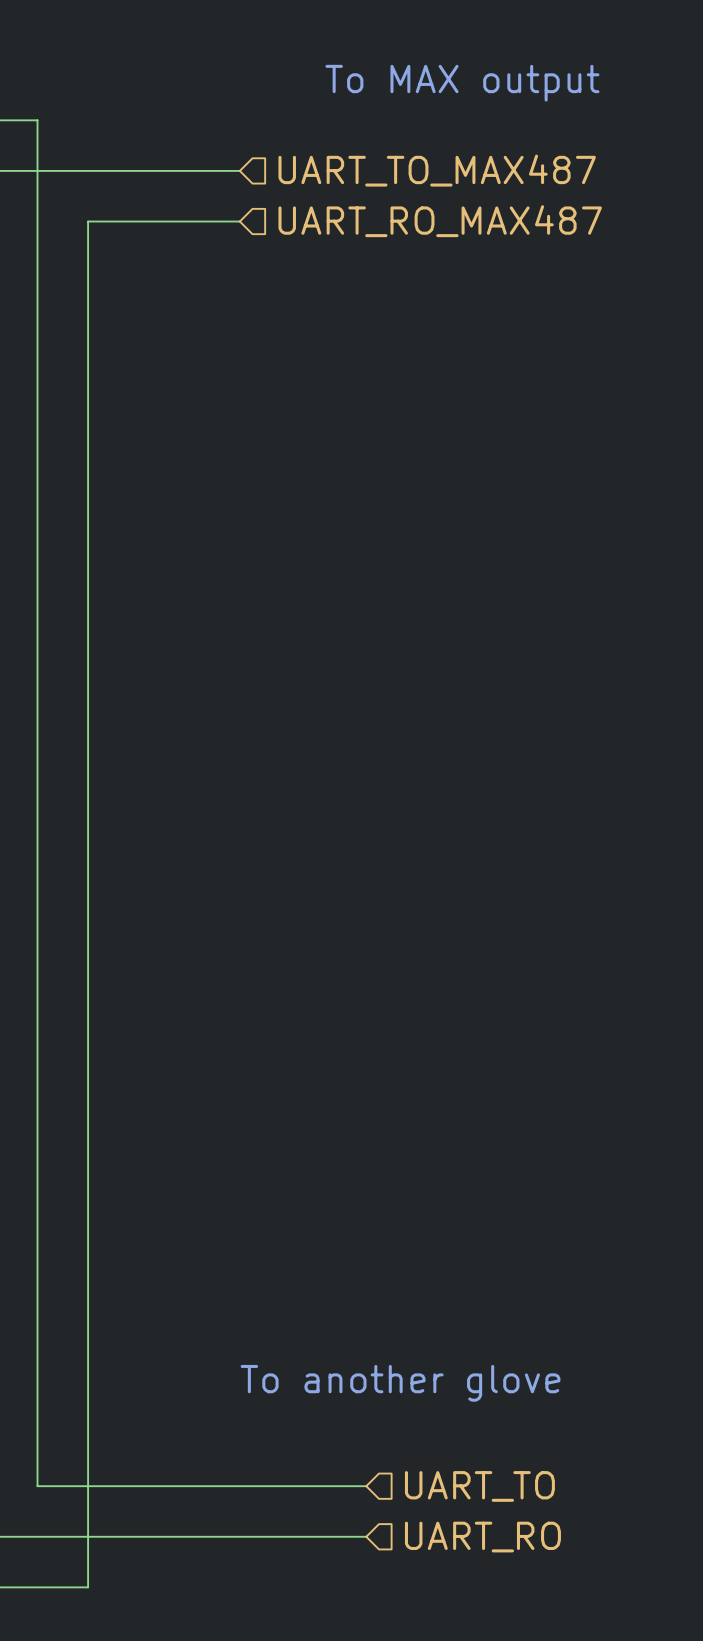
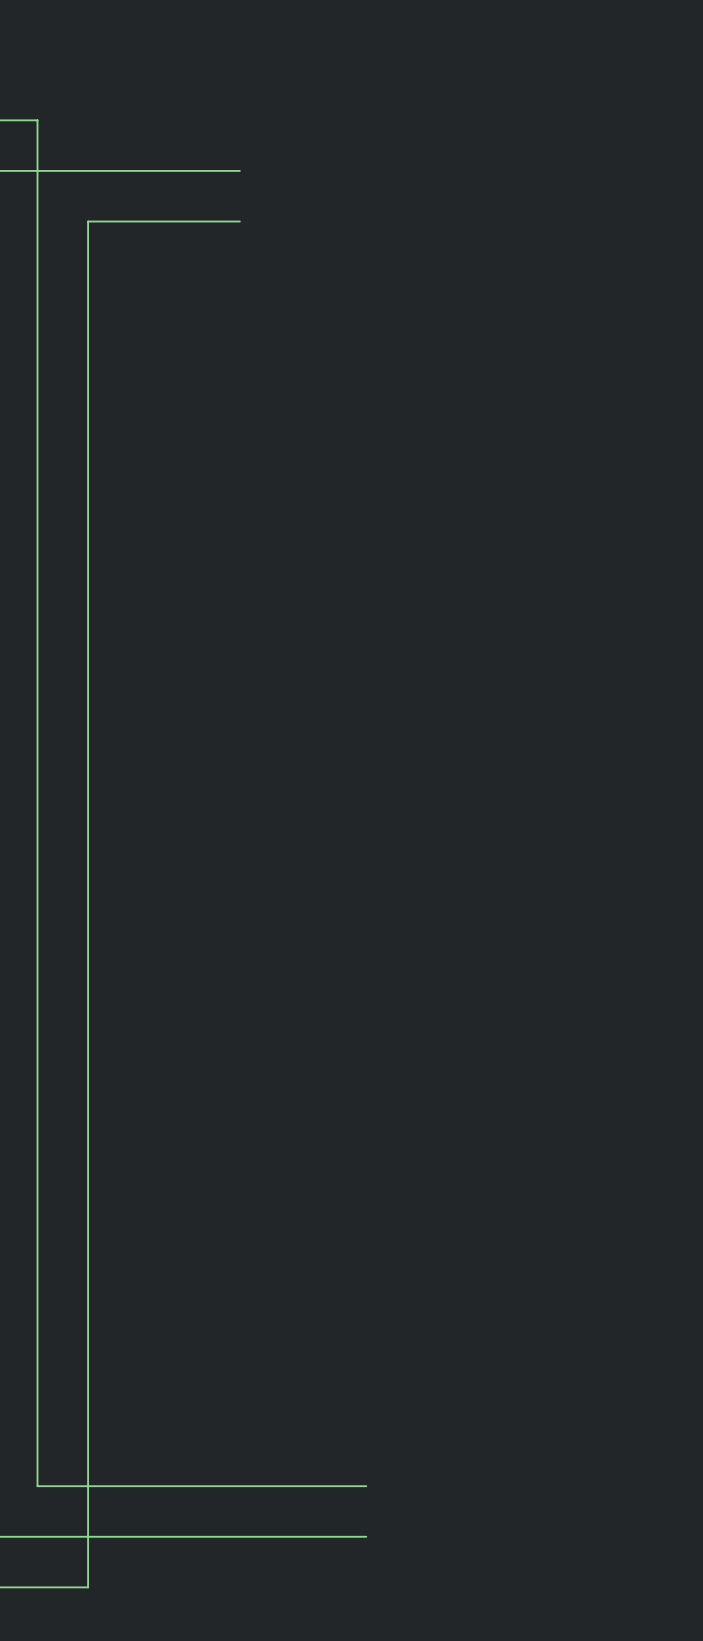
text: To MAX output (462, 83) -> none
hierarchical label: UART_TO_MAX487 (437, 170) -> none
hierarchical label: UART_RO_MAX487 (440, 221) -> none
text: To another glove (400, 1383) -> none
hierarchical label: UART_TO (479, 1486) -> none
hierarchical label: UART_RO (482, 1537) -> none

